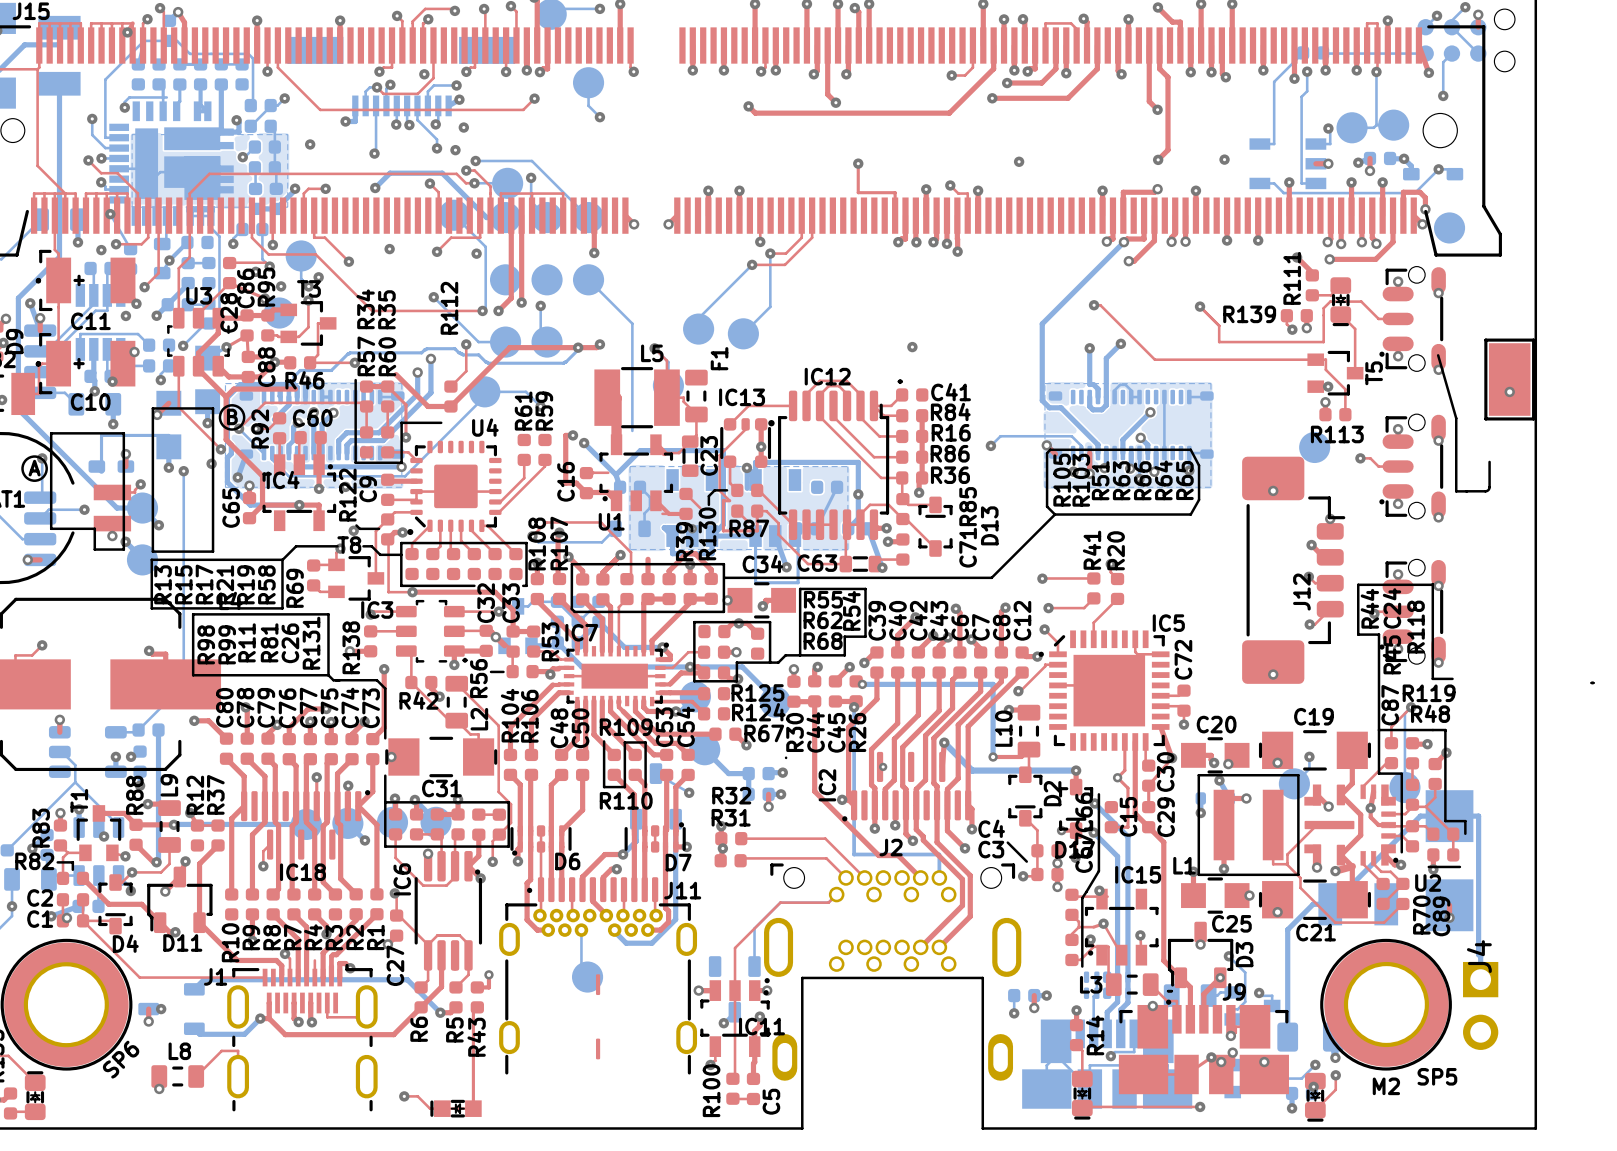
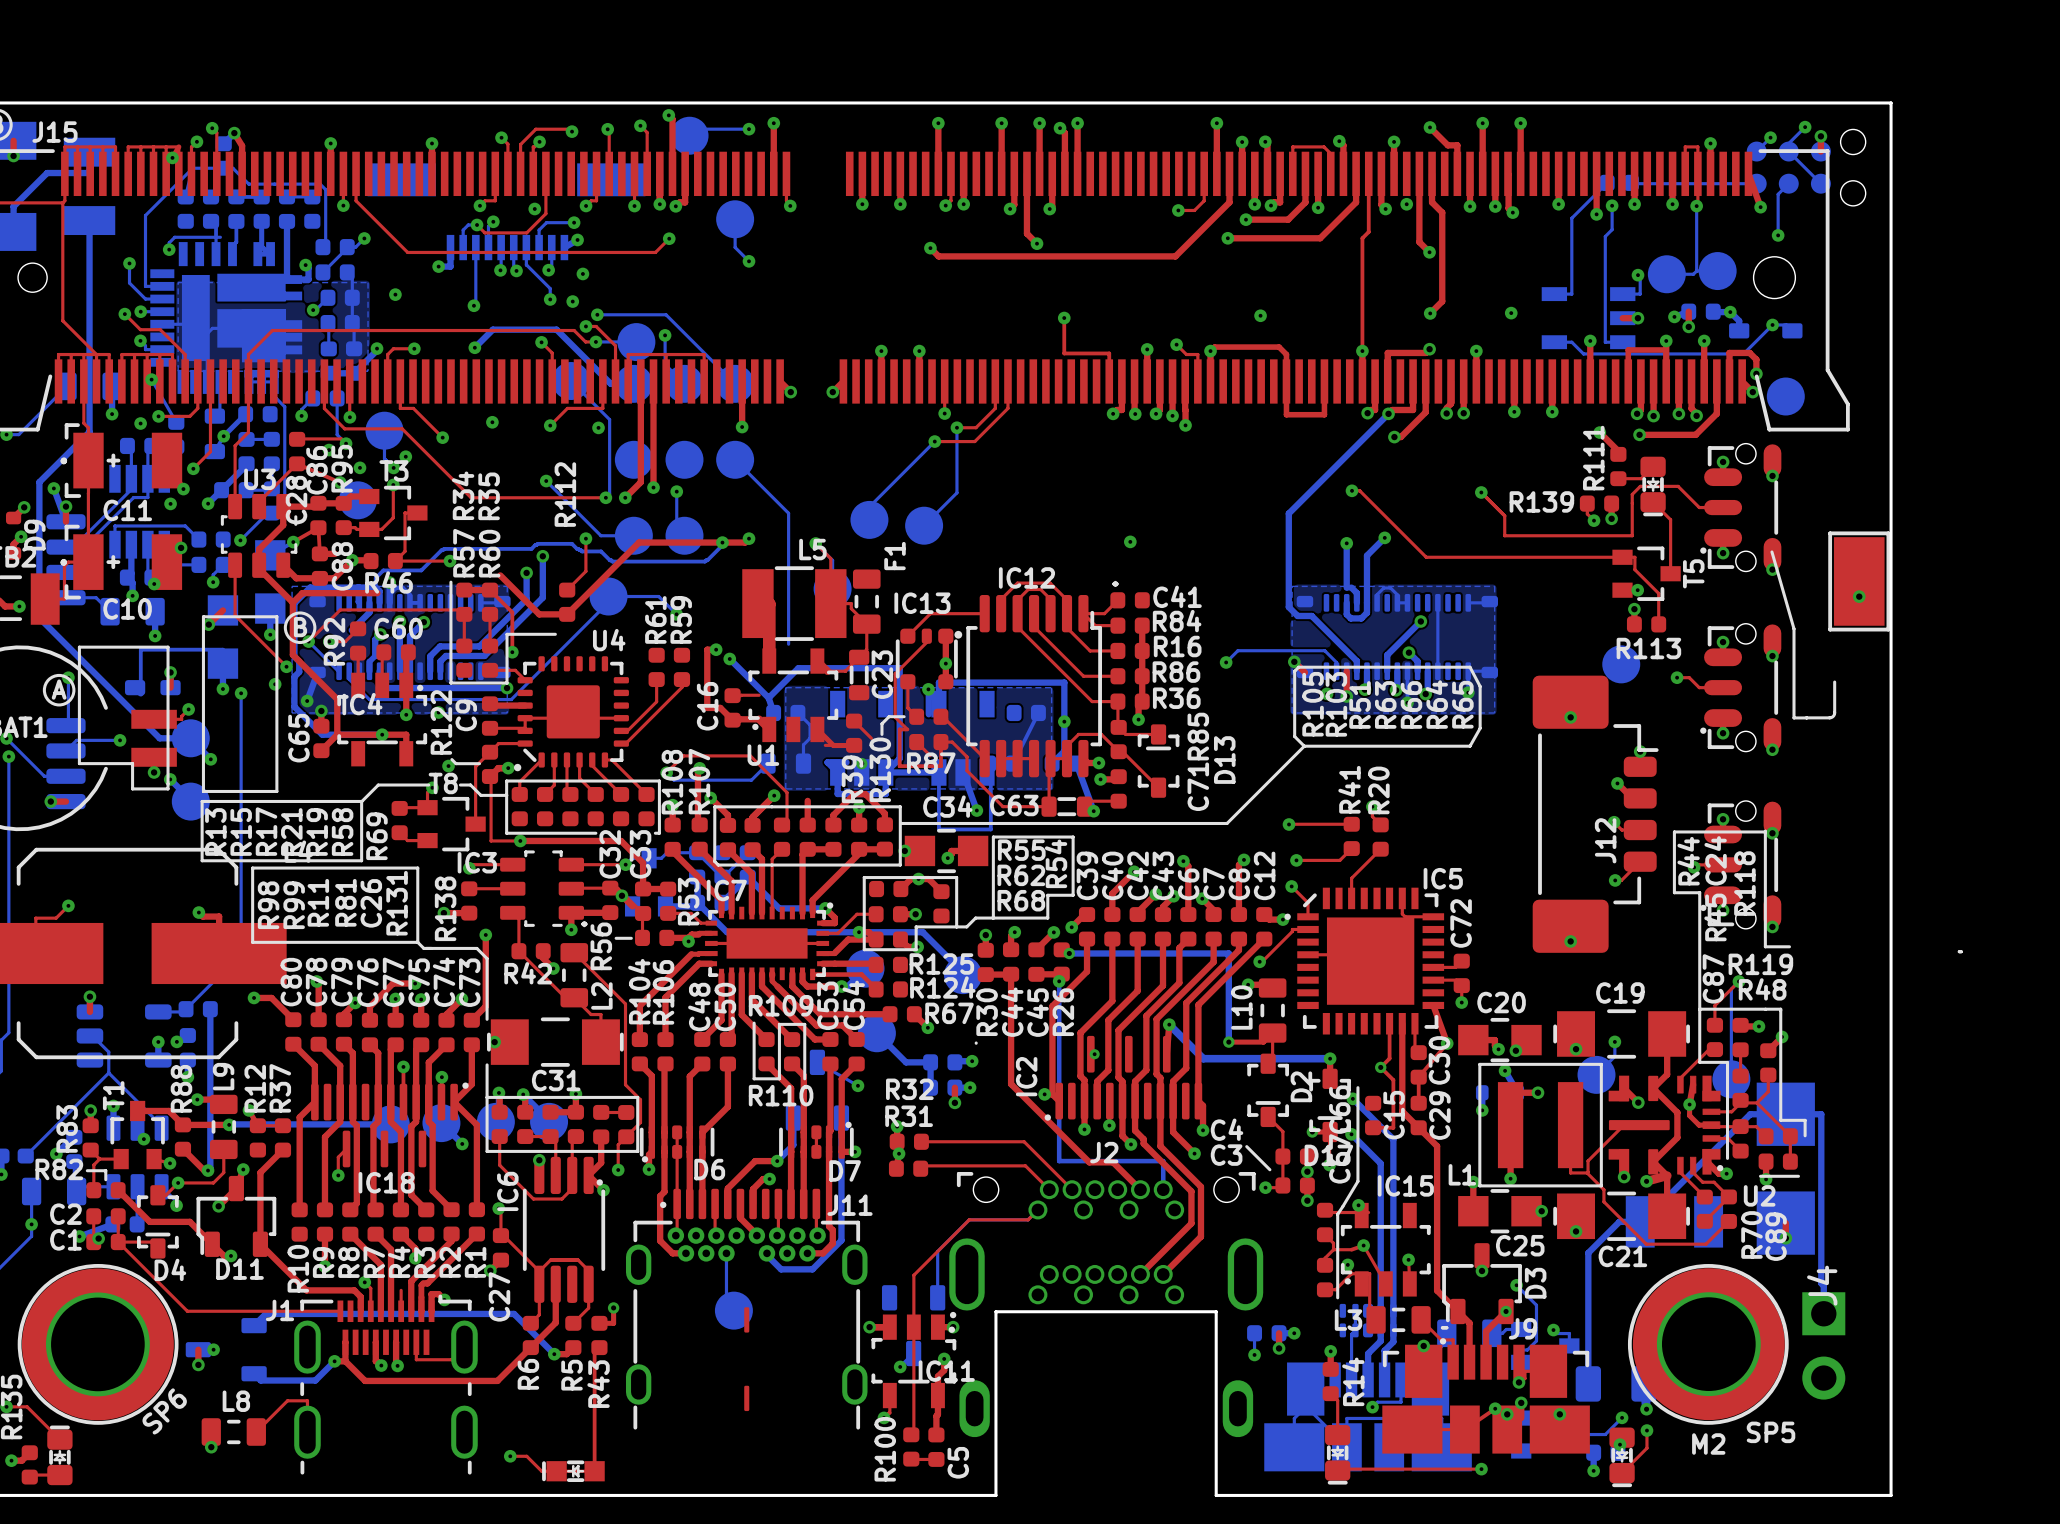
top track: none -> (1368, 173) (1368, 231) (1362, 238) (1362, 351)
via: none -> (1406, 204)
top track: none -> (1666, 349) (1628, 349) (1628, 381)
top track: none -> (1210, 351) (1214, 347) (1279, 347) (1286, 354) (1286, 414) (1324, 414) (1324, 381)

